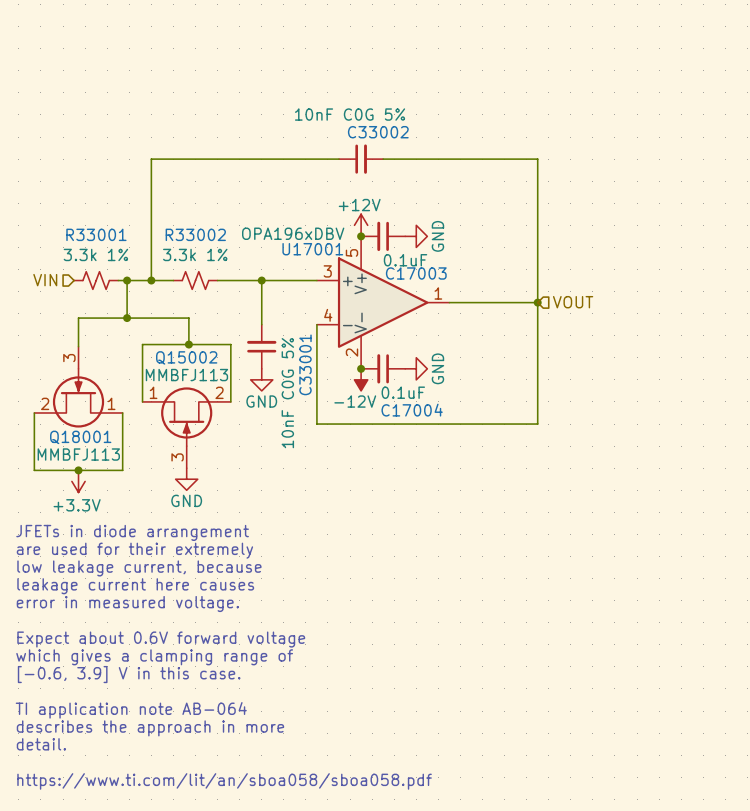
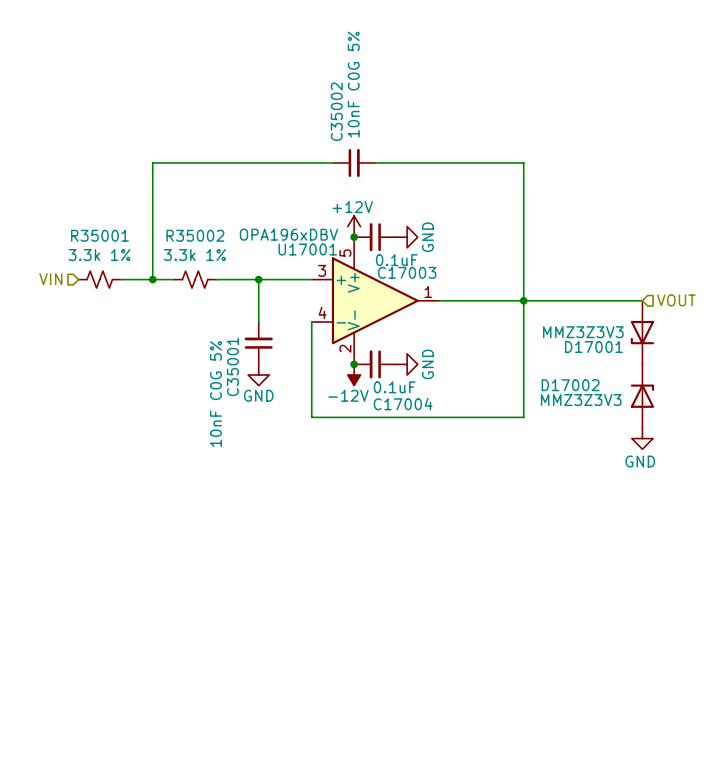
C33002 value rotation: 0° (350, 114) -> 90° counterclockwise (353, 84)
C33002 name: C33002 (378, 132) -> C35002 (336, 111)
R33001 name: R33001 (96, 234) -> R35001 (100, 235)
R33002 name: R33002 (195, 234) -> R35002 (195, 235)
wire: (127, 280) (127, 318) -> none
junction: (127, 280) -> none
wire: none -> (523, 300) (642, 300)
hierarchical label position: VOUT (573, 302) -> VOUT (676, 300)
junction: (127, 318) -> none
D17001: none -> MMZ3Z3V3 (642, 332)
wire: (188, 344) (188, 318) (78, 318) (78, 346) -> none
junction: (188, 344) -> none
C33001 name: C33001 (305, 364) -> C35001 (232, 366)
Q18001: MMBFJ113 (78, 387) -> none
C33001 value position: 10nF C0G 5% (287, 393) -> 10nF C0G 5% (215, 394)
wire: (142, 401) (142, 344) (230, 344) (230, 401) -> none
D17002: none -> MMZ3Z3V3 (642, 396)
wire: (34, 412) (34, 470) (122, 470) (122, 412) -> none
Q15002: MMBFJ113 (186, 427) -> none
power symbol: none -> GND (642, 438)
junction: (78, 470) -> none
power symbol: GND (186, 479) -> none
power symbol: +3.3V (78, 481) -> none
text: JFETs in diode arrangement (132, 532) -> none
text: are used for their extremely (134, 550) -> none
text: low leakage current, because (139, 568) -> none
text: leakage current here causes (135, 586) -> none
text: error in measured voltage. (127, 603) -> none
text: Expect about 0.6V forward voltage (161, 639) -> none
text: which gives a clamping range of (154, 657) -> none
text: [-0.6, 3.9] V in this case. (129, 674) -> none
text: TI application note AB-064 (131, 710) -> none
text: describes the approach in more (150, 728) -> none
text: detail. (41, 744) -> none
text: https://www.ti.com/lit/an/sboa058/sboa058.pdf (224, 781) -> none

